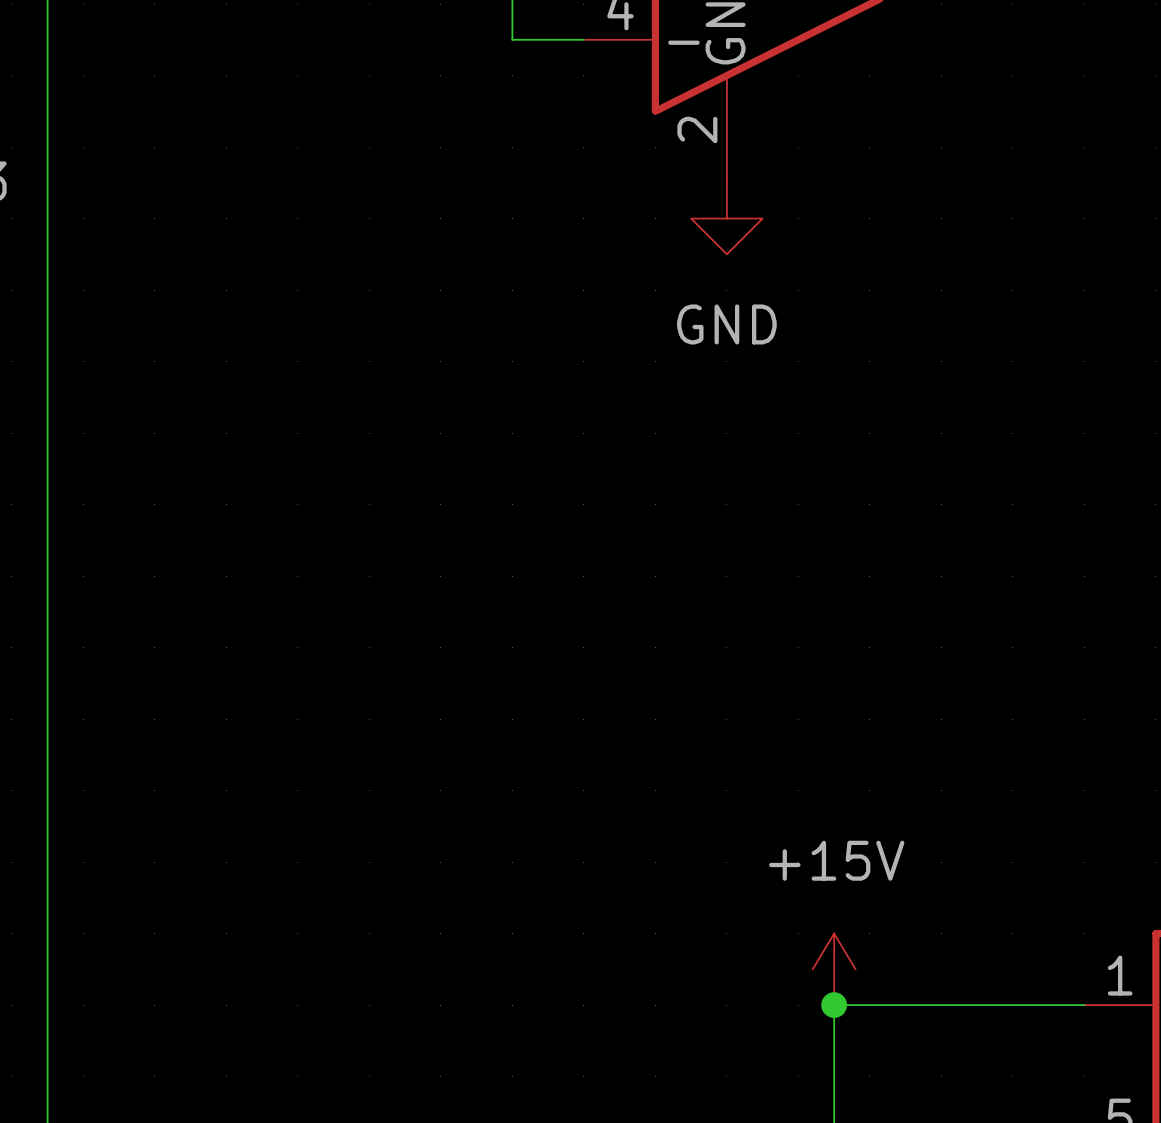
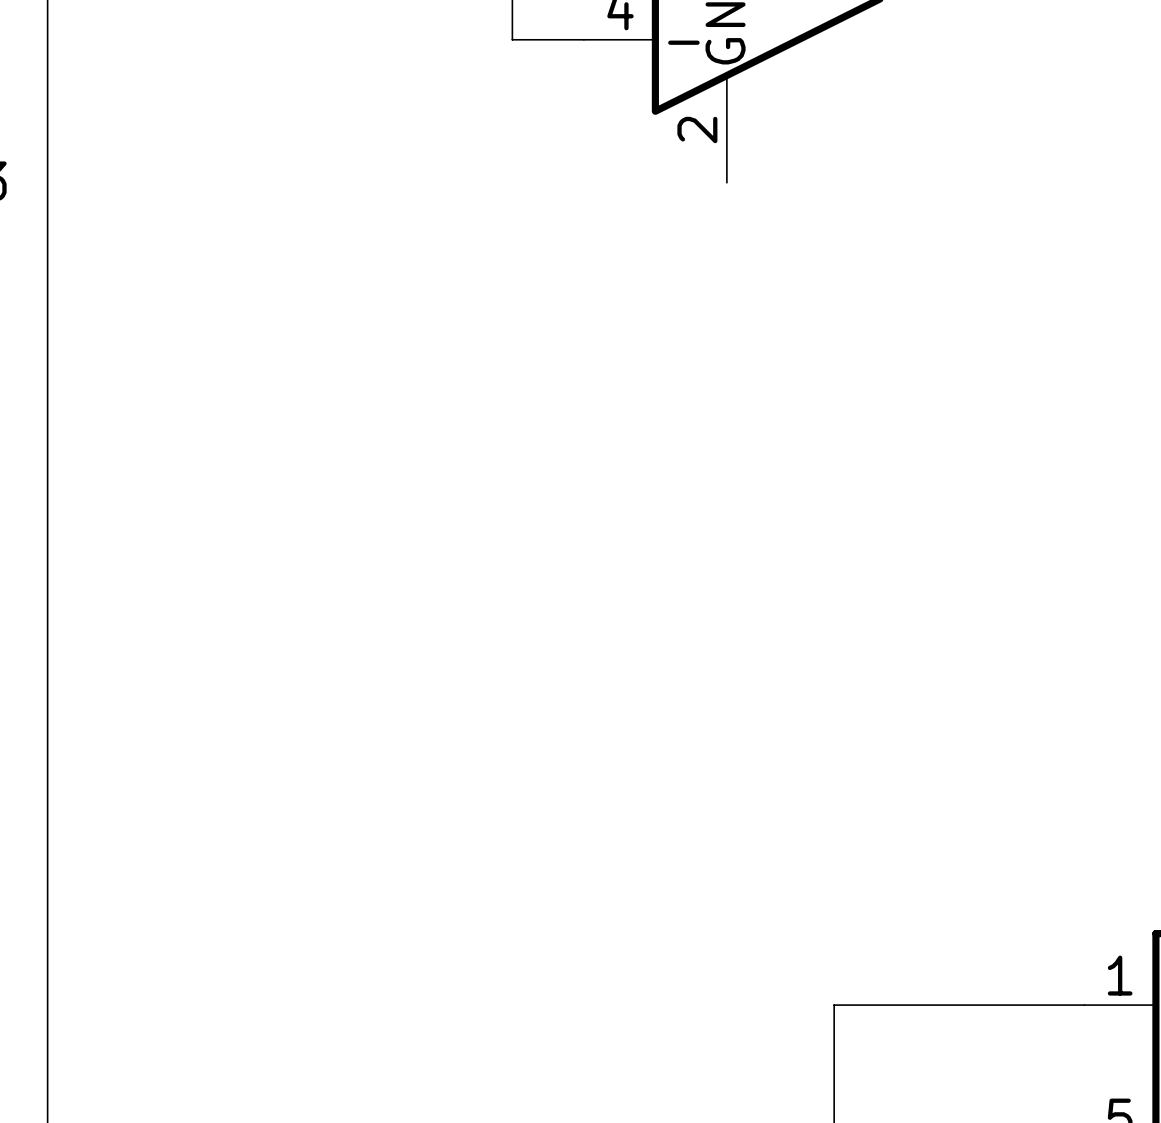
power symbol: GND (726, 218) -> none
power symbol: +15V (834, 969) -> none
junction: (834, 1005) -> none

